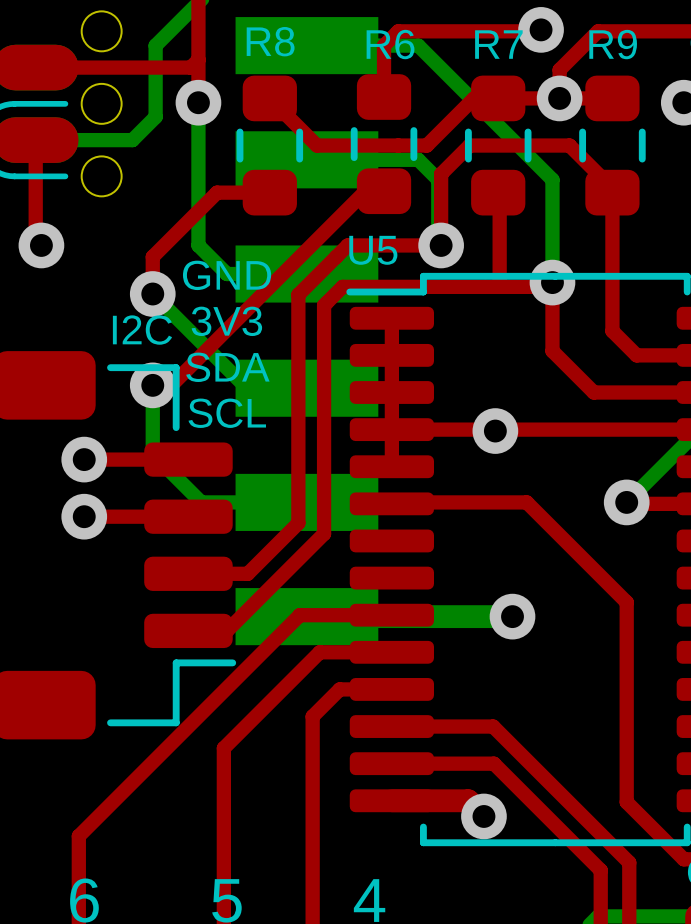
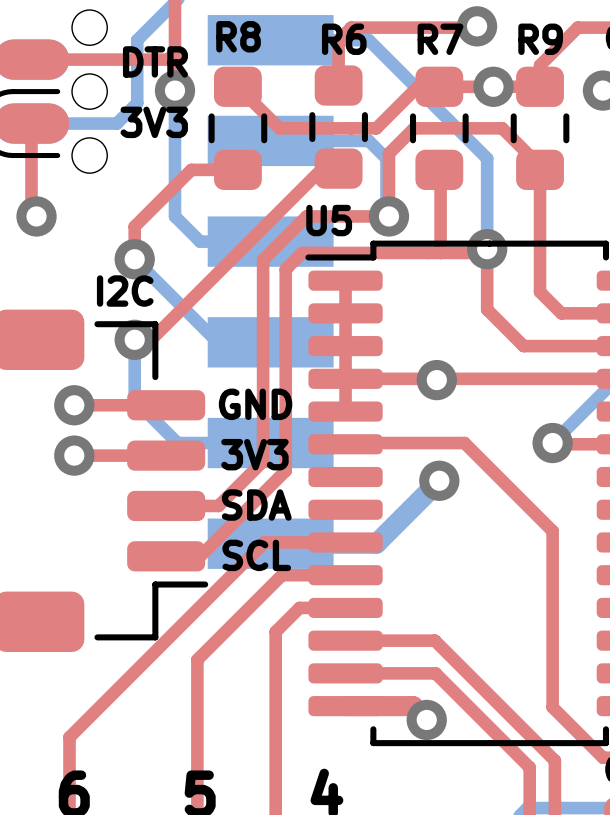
top track: (655, 31) (598, 31) (559, 69) (559, 98) -> (577, 27) (540, 65) (540, 86)
text: none -> DTR (155, 61)
text: none -> 3V3 (154, 122)
text: GND (227, 275) -> none
text: 3V3 (226, 321) -> none
text position: SDA (227, 367) -> SDA (256, 505)
text position: SCL (227, 413) -> SCL (256, 555)
text: none -> GND (255, 404)
text: none -> 3V3 (254, 454)
bottom track: (426, 616) (512, 616) -> (376, 543) (439, 480)
via position: (512, 616) -> (439, 480)

